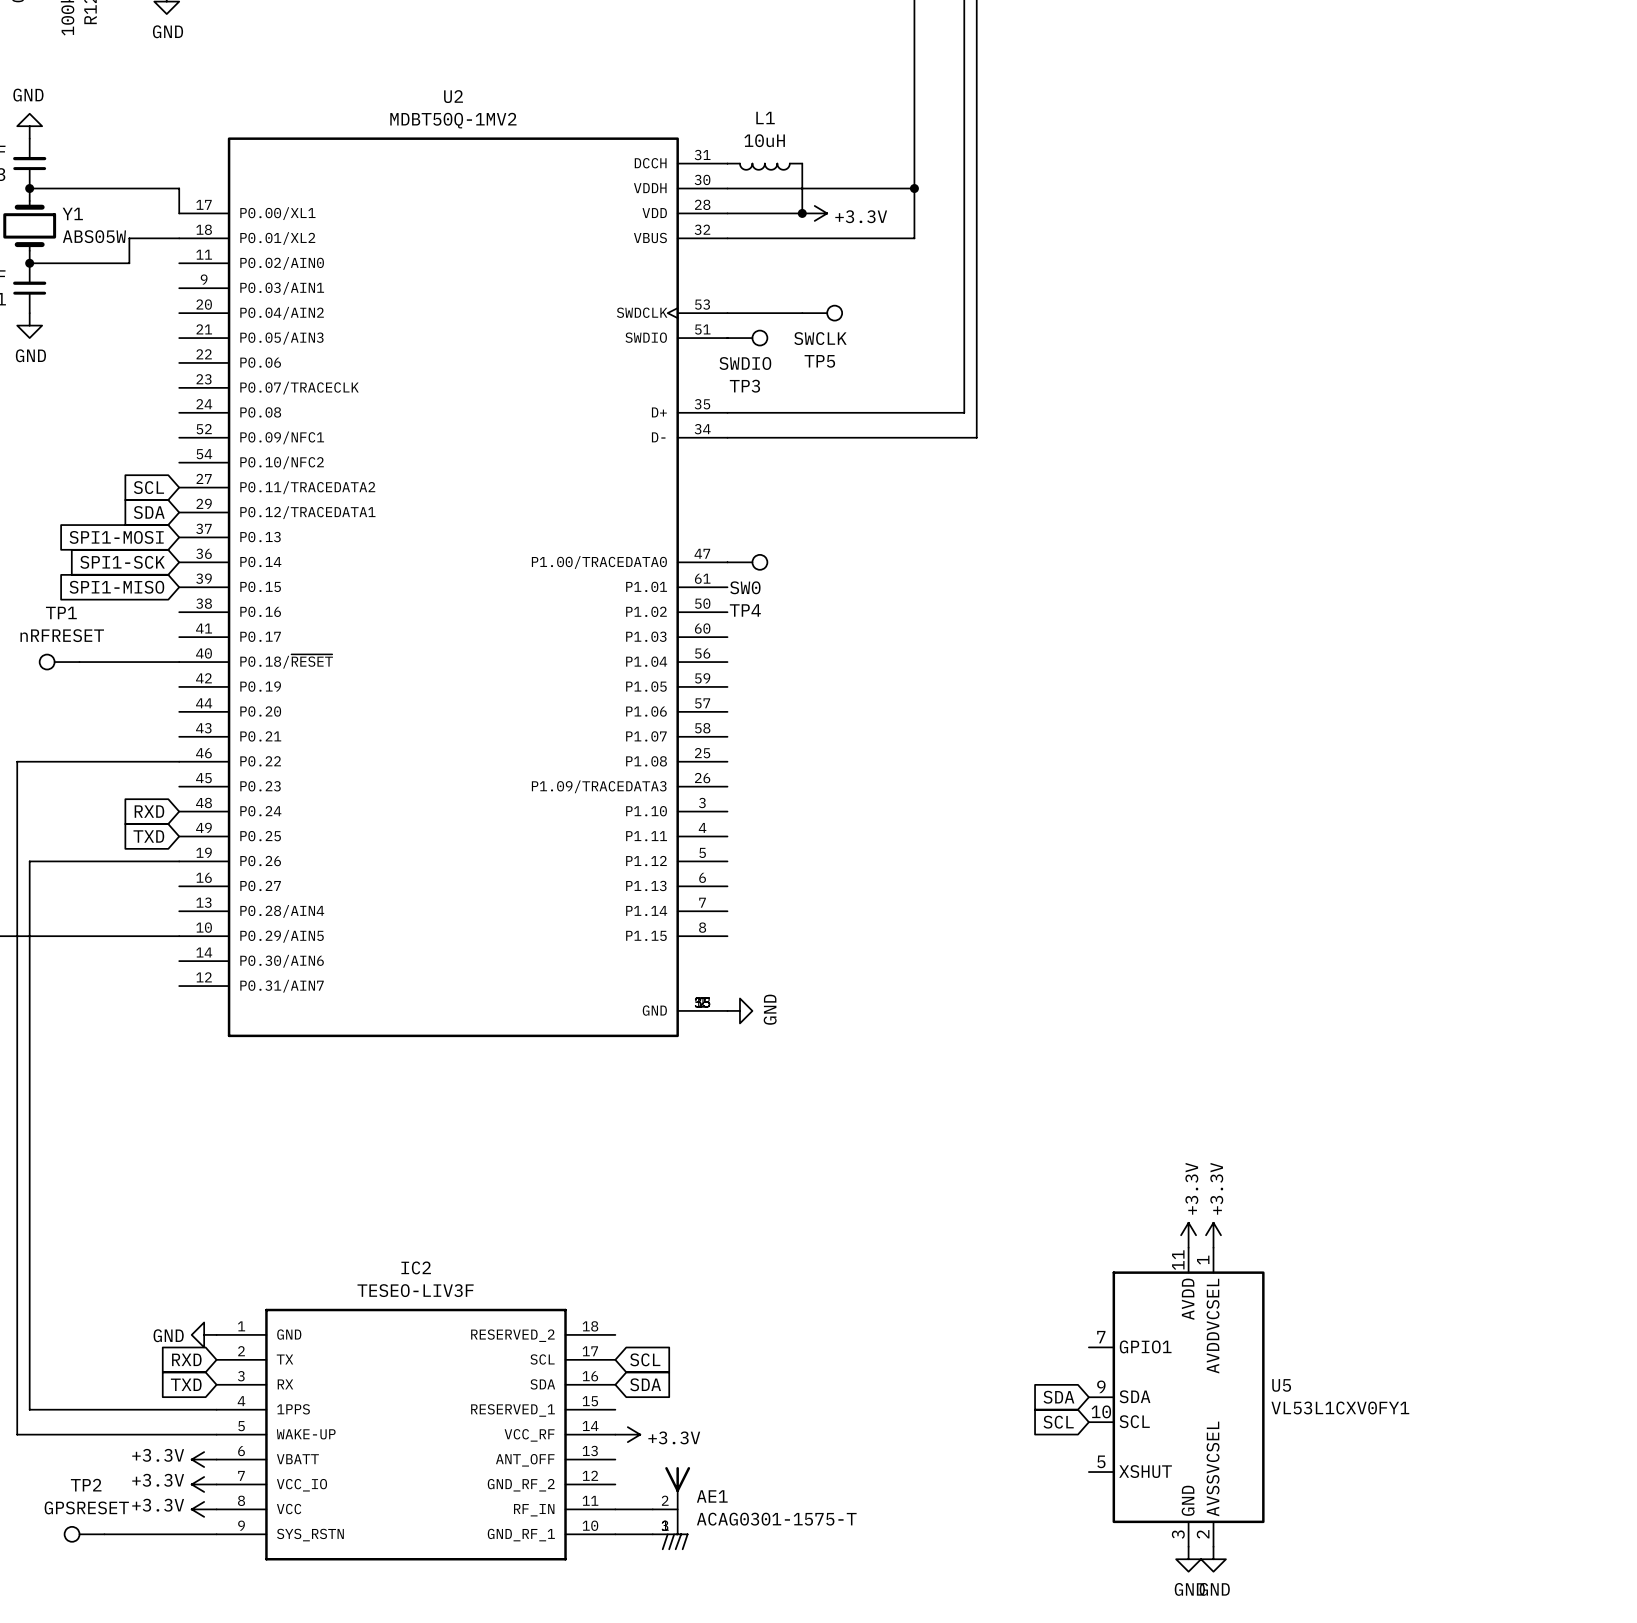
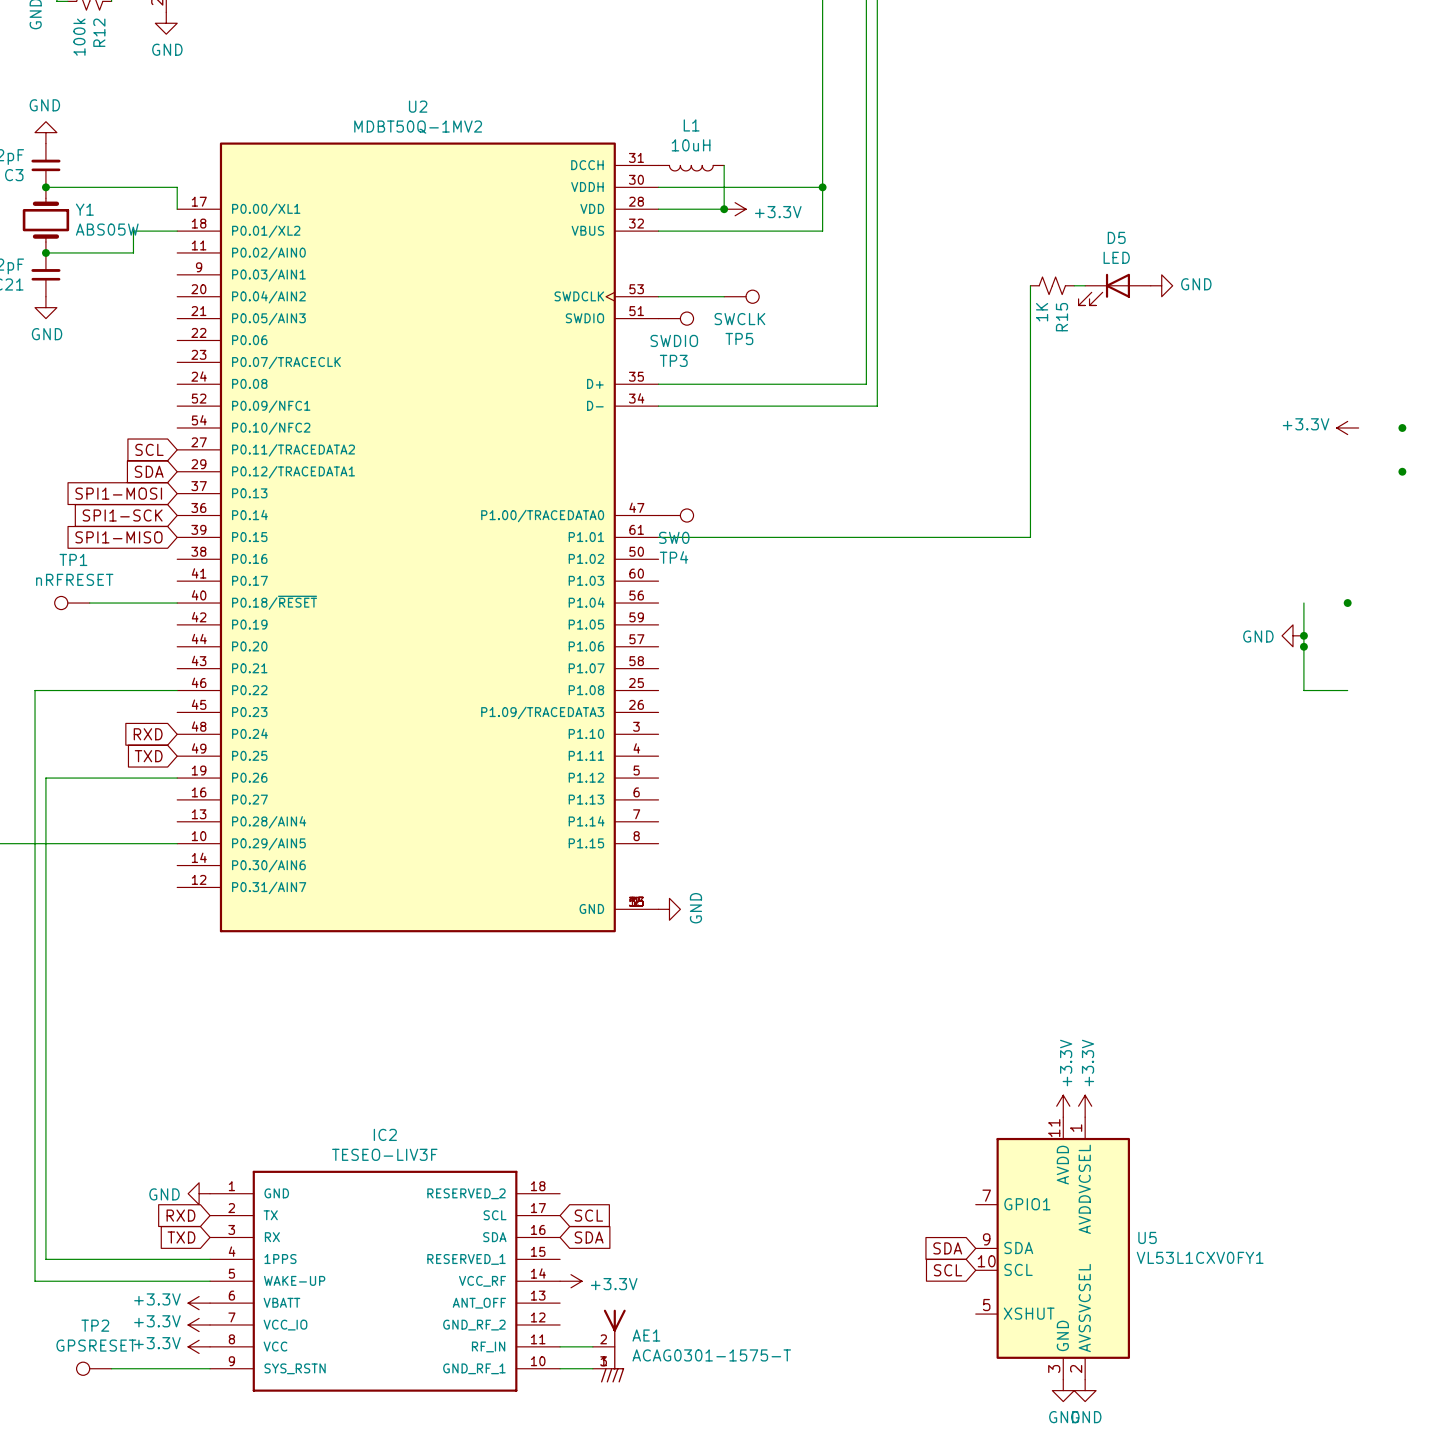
wire: none -> (1030, 285) (1030, 537) (658, 537)
R15: none -> 1K (1052, 285)
wire: none -> (1074, 285) (1085, 285)
power symbol: none -> GND (1161, 285)
D5: none -> LED (1114, 289)
power symbol: none -> +3.3V (1347, 427)
junction: none -> (1402, 427)
junction: none -> (1402, 471)
wire: none -> (1303, 603) (1303, 690) (1347, 690)
junction: none -> (1347, 603)
power symbol: none -> GND (1292, 635)
junction: none -> (1303, 635)
junction: none -> (1303, 646)

